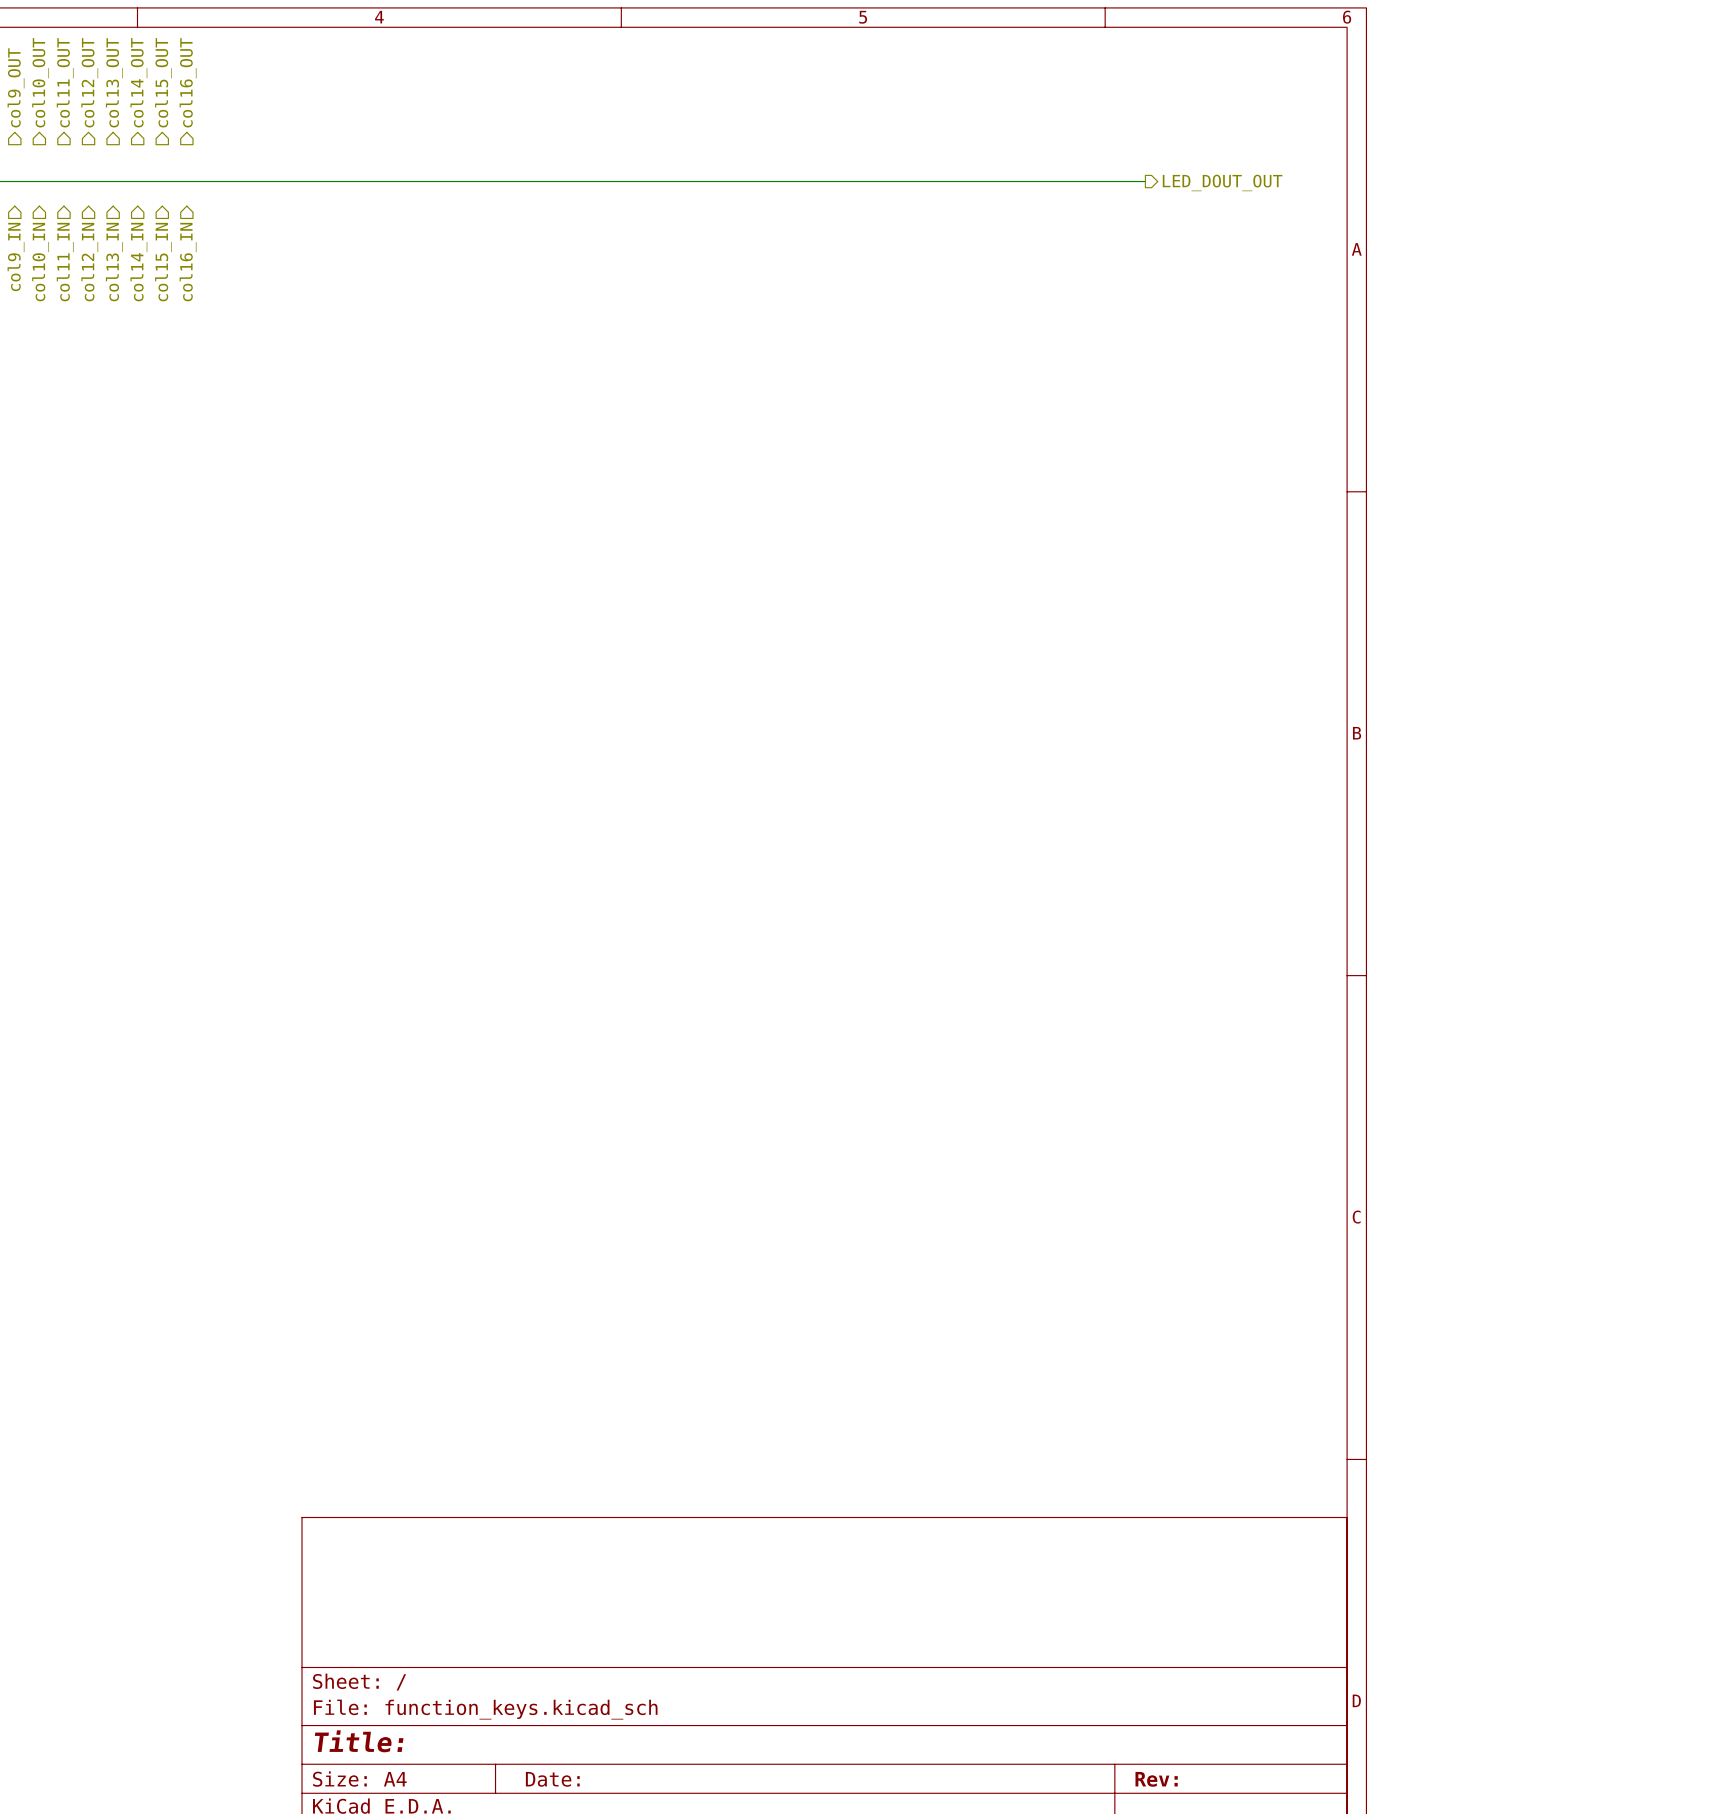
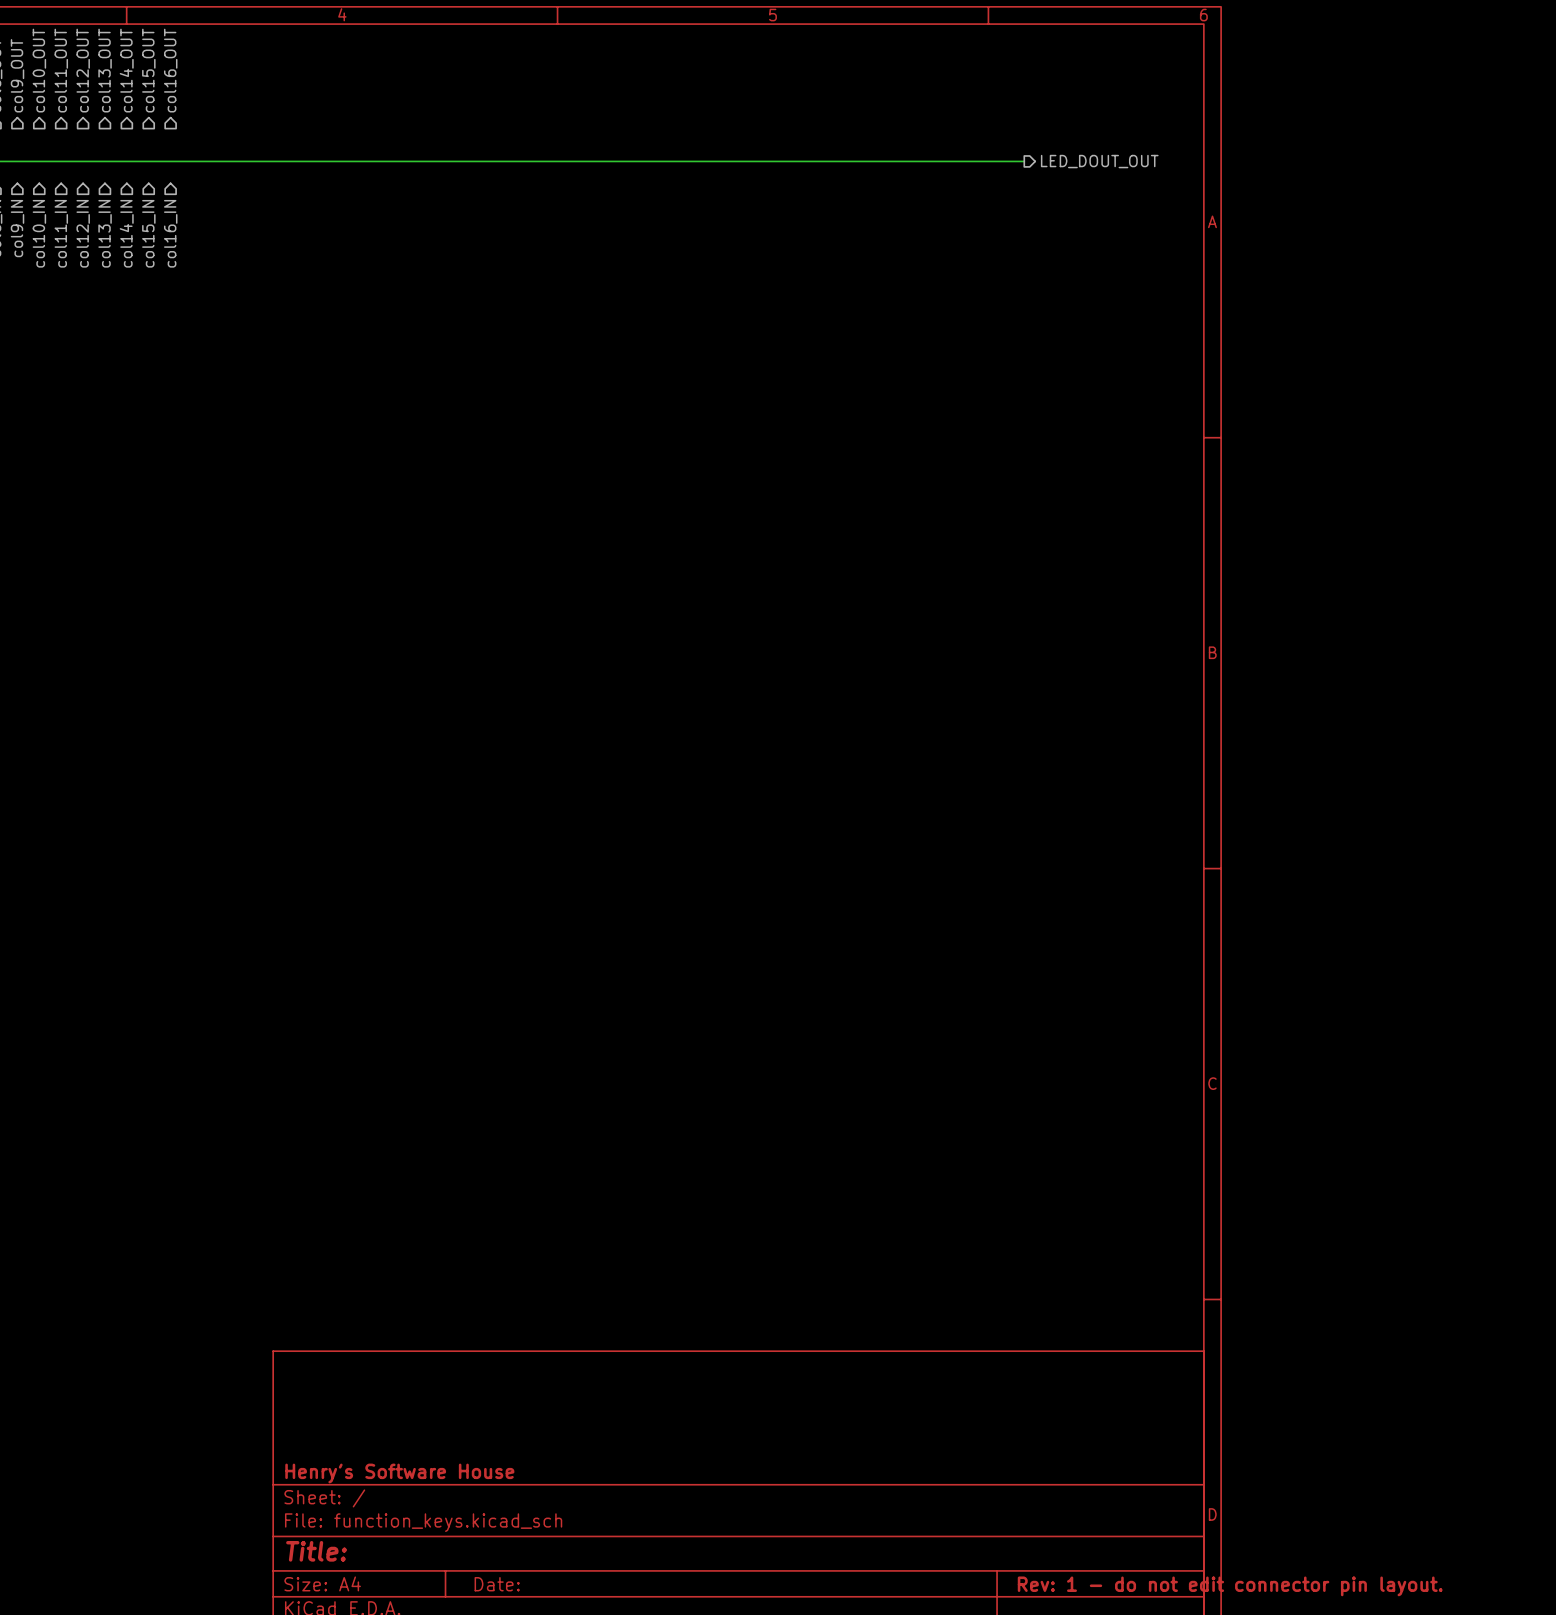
title block: none -> Henry's Software House (399, 1473)
title block: Rev: (1156, 1779) -> Rev: 1 - do not edit connector pin layout. (1230, 1586)

